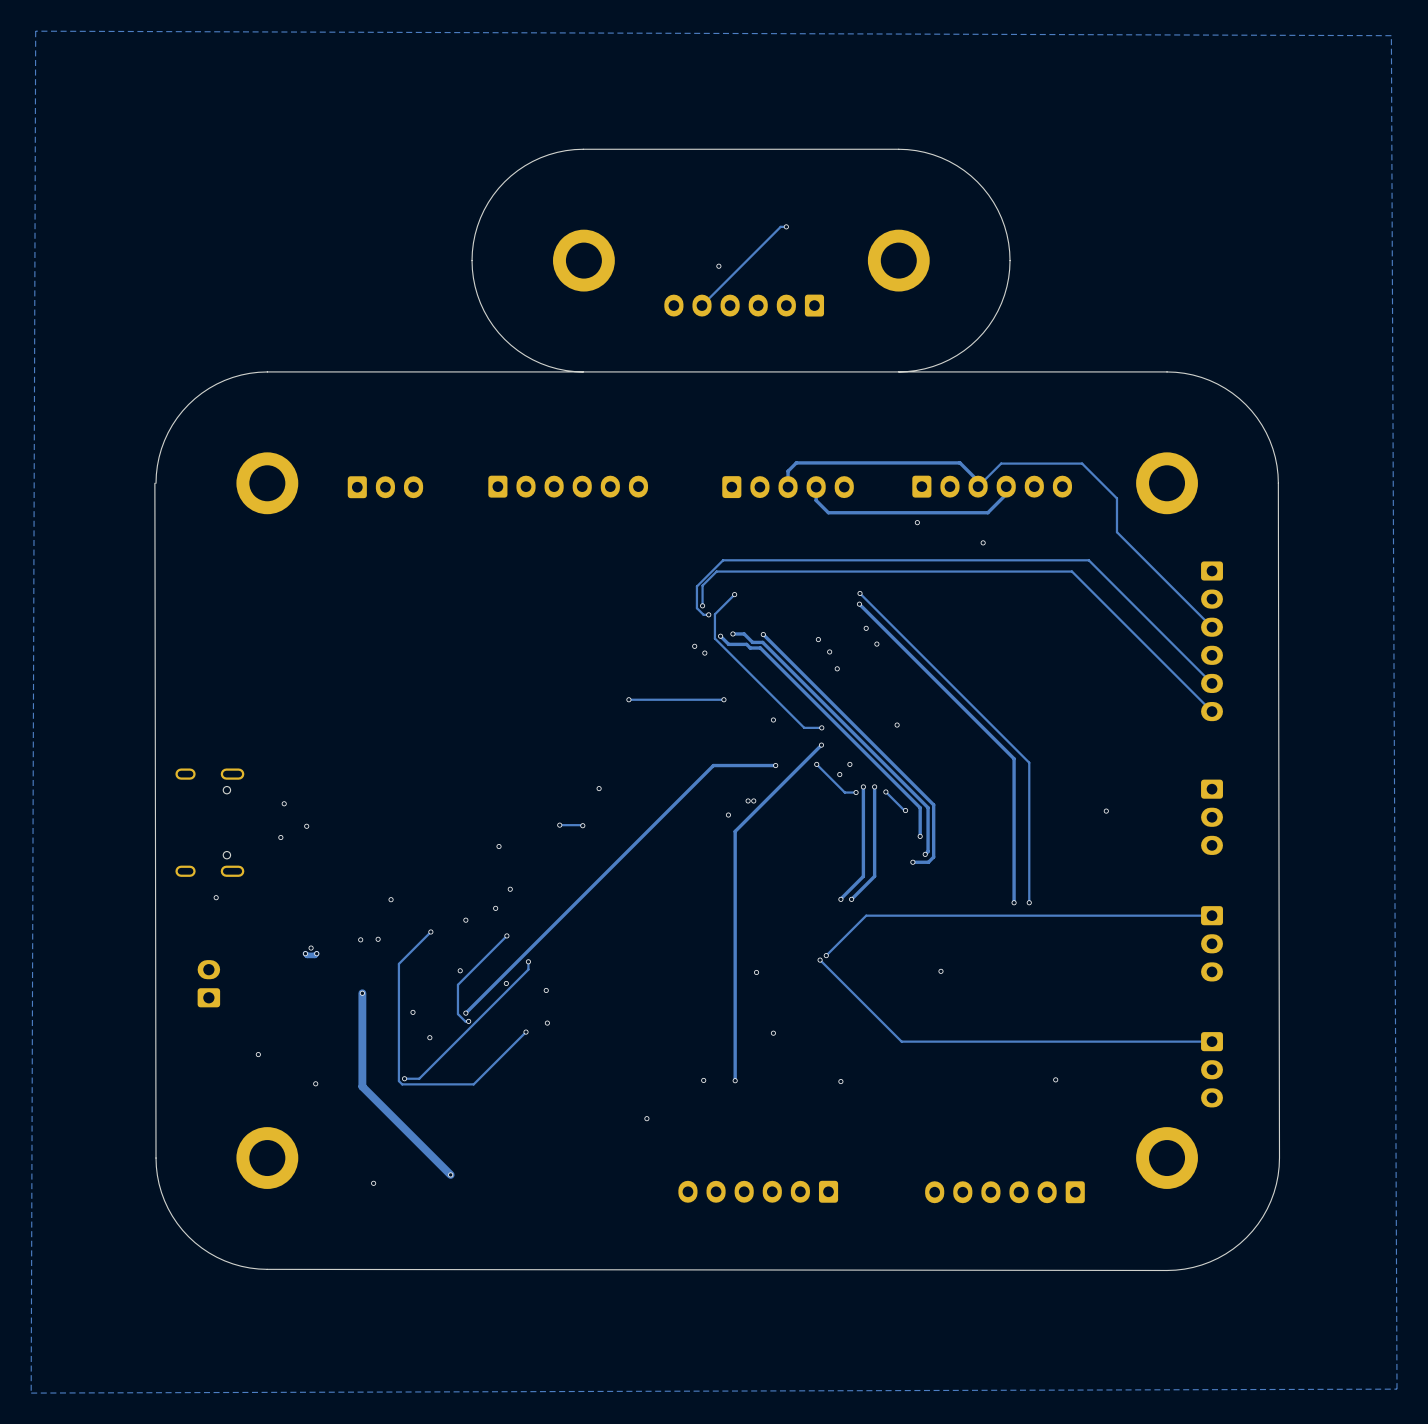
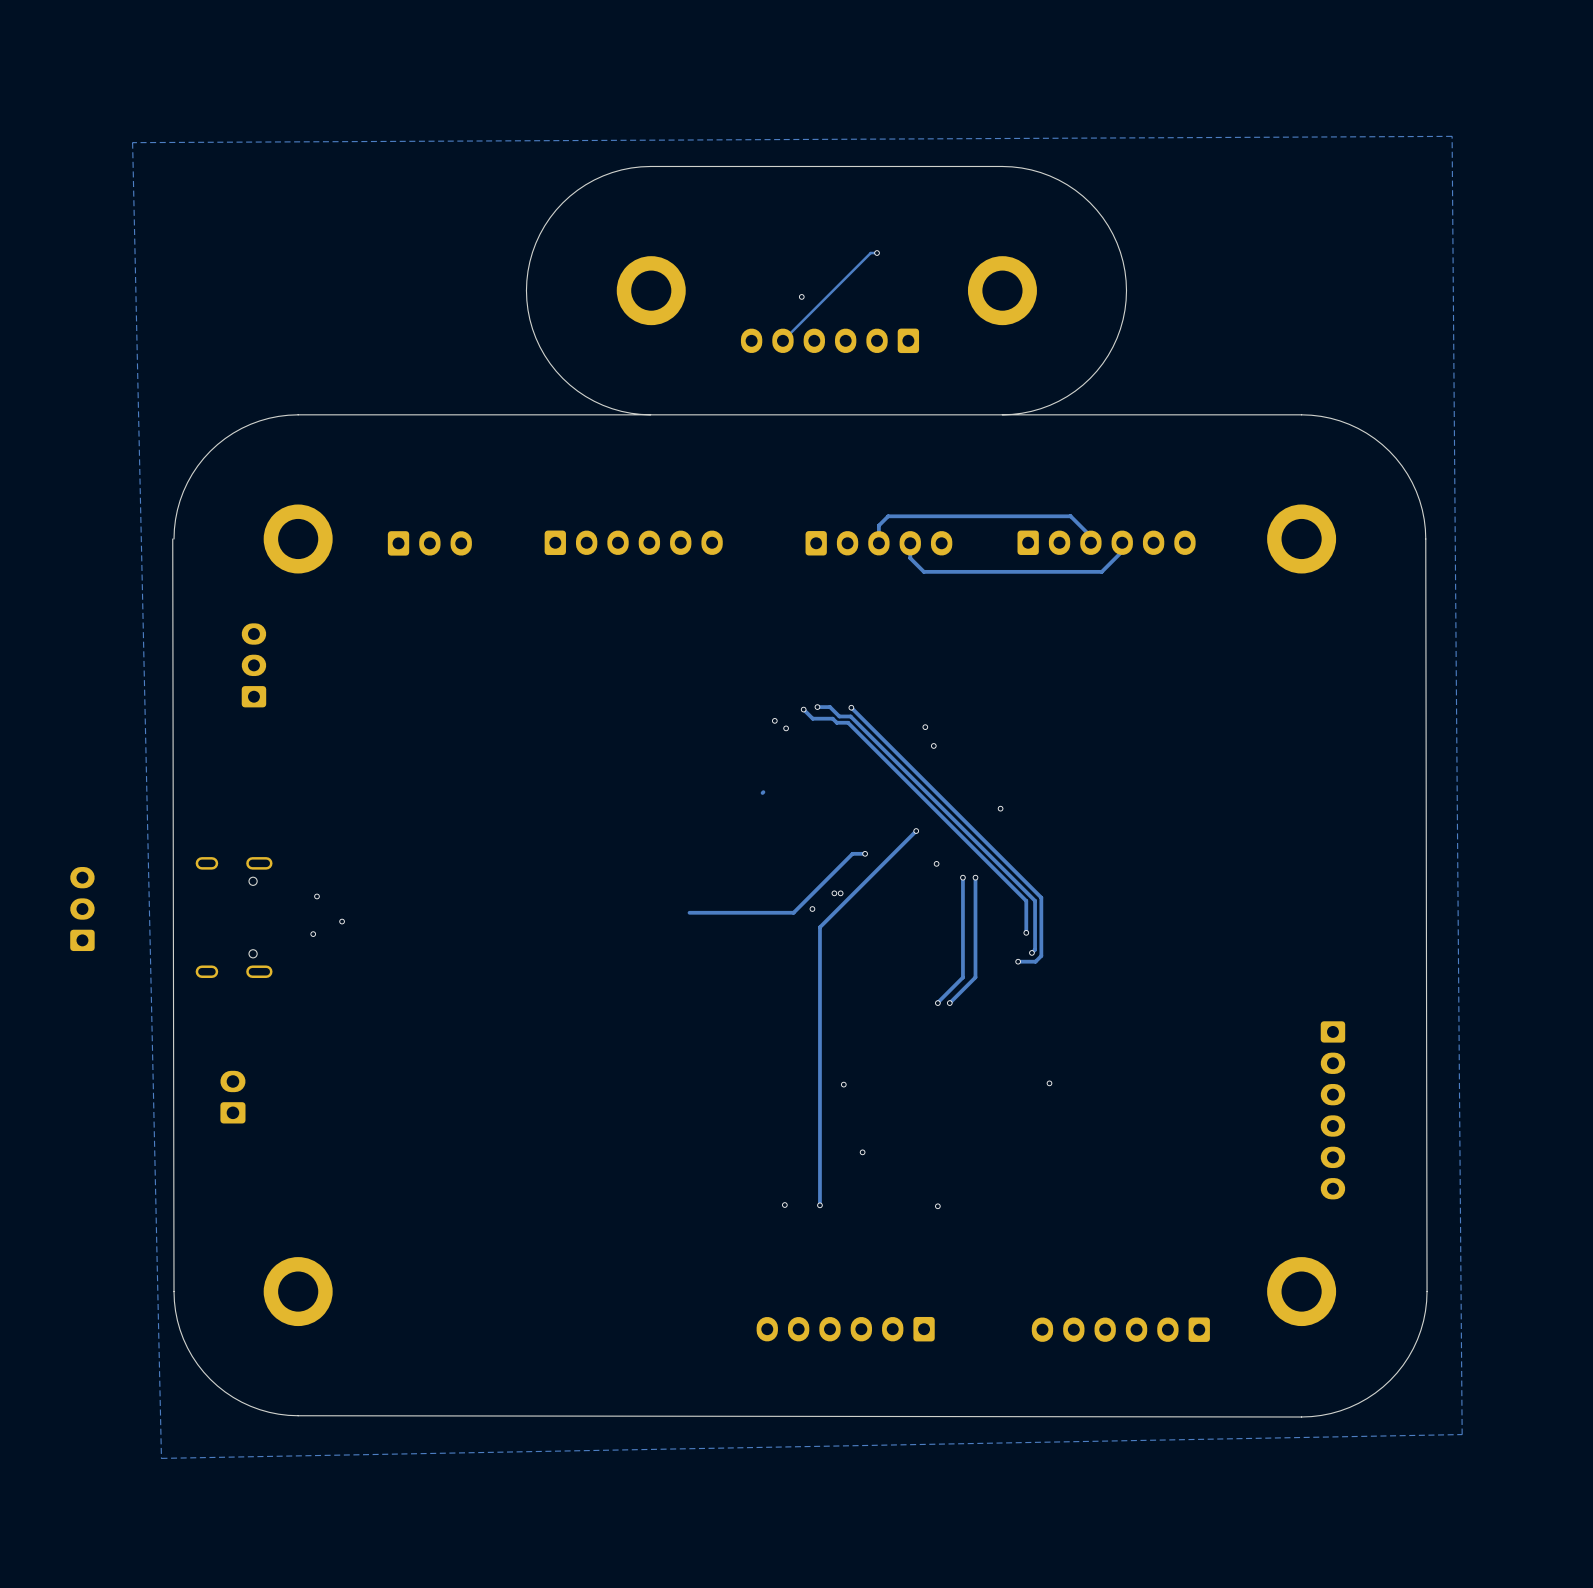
zone outline: (35, 31) (1391, 35) (1397, 1389) (31, 1393) (35, 31) -> (1452, 136) (1462, 1434) (161, 1458) (132, 142) (1452, 136)
track: (978, 486) (1001, 463) (1082, 463) (1116, 498) (1116, 532) (1212, 627) -> none
via: (917, 522) -> none
via: (983, 542) -> none
track: (860, 593) (1029, 762) (1029, 902) -> none
via: (860, 593) -> none
track: (734, 594) (714, 614) (714, 638) (804, 727) (821, 727) -> none
via: (734, 594) -> none
part: none -> (253, 665)
track: (859, 604) (1014, 758) (1014, 902) -> none
via: (859, 604) -> none
track: (702, 605) (702, 585) (716, 571) (1072, 571) (1212, 711) -> none
via: (702, 605) -> none
track: (708, 614) (703, 614) (696, 608) (696, 586) (723, 560) (1088, 560) (1212, 683) -> none
via: (708, 614) -> none
via: (866, 628) -> none
via: (818, 639) -> none
part: (1212, 641) -> none
via: (876, 644) -> none
via: (628, 699) -> none
track: (723, 699) (628, 699) -> none
via: (723, 699) -> none
track: none -> (763, 792) (762, 792)
via: (773, 720) -> none
via: (821, 727) -> none
track: (816, 764) (844, 792) (856, 792) -> none
via: (816, 764) -> none
via: (849, 764) -> none
track: (764, 765) (713, 765) (465, 1013) -> (852, 853) (793, 912) (689, 912)
via: (599, 788) -> none
track: (885, 791) (905, 810) -> none
via: (885, 791) -> none
via: (856, 792) -> none
via: (905, 810) -> none
via: (1106, 811) -> none
part: none -> (82, 909)
part: (1212, 817) -> none
track: (559, 825) (582, 825) -> none
via: (559, 825) -> none
via: (582, 825) -> none
via: (499, 846) -> none
via: (510, 889) -> none
via: (216, 897) -> none
via: (391, 899) -> none
via: (1014, 902) -> none
via: (1029, 902) -> none
via: (495, 908) -> none
track: (1212, 915) (866, 915) (826, 955) -> none
via: (465, 920) -> none
track: (430, 931) (398, 963) (398, 1081) (402, 1084) (473, 1084) (526, 1032) -> none
via: (430, 931) -> none
track: (506, 935) (457, 984) (457, 1014) (465, 1021) (468, 1021) -> none
via: (506, 935) -> none
via: (360, 939) -> none
via: (378, 939) -> none
part: (1212, 943) -> none
via: (311, 948) -> none
via: (305, 953) -> none
track: (316, 953) (315, 955) (305, 953) -> none
via: (316, 953) -> none
via: (826, 955) -> none
track: (820, 960) (901, 1041) (1212, 1041) -> none
via: (820, 960) -> none
track: (528, 961) (528, 969) (419, 1078) (404, 1078) -> none
via: (528, 961) -> none
via: (460, 970) -> none
via: (506, 983) -> none
via: (546, 990) -> none
track: (362, 993) (362, 1086) (450, 1174) -> none
via: (362, 993) -> none
part: none -> (1332, 1110)
via: (412, 1012) -> none
via: (465, 1013) -> none
via: (468, 1021) -> none
via: (547, 1023) -> none
via: (526, 1032) -> none
via: (429, 1037) -> none
via: (258, 1054) -> none
part: (1212, 1069) -> none
via: (404, 1078) -> none
via: (1055, 1079) -> none
via: (315, 1083) -> none
via: (646, 1118) -> none
via: (450, 1174) -> none
via: (373, 1183) -> none

